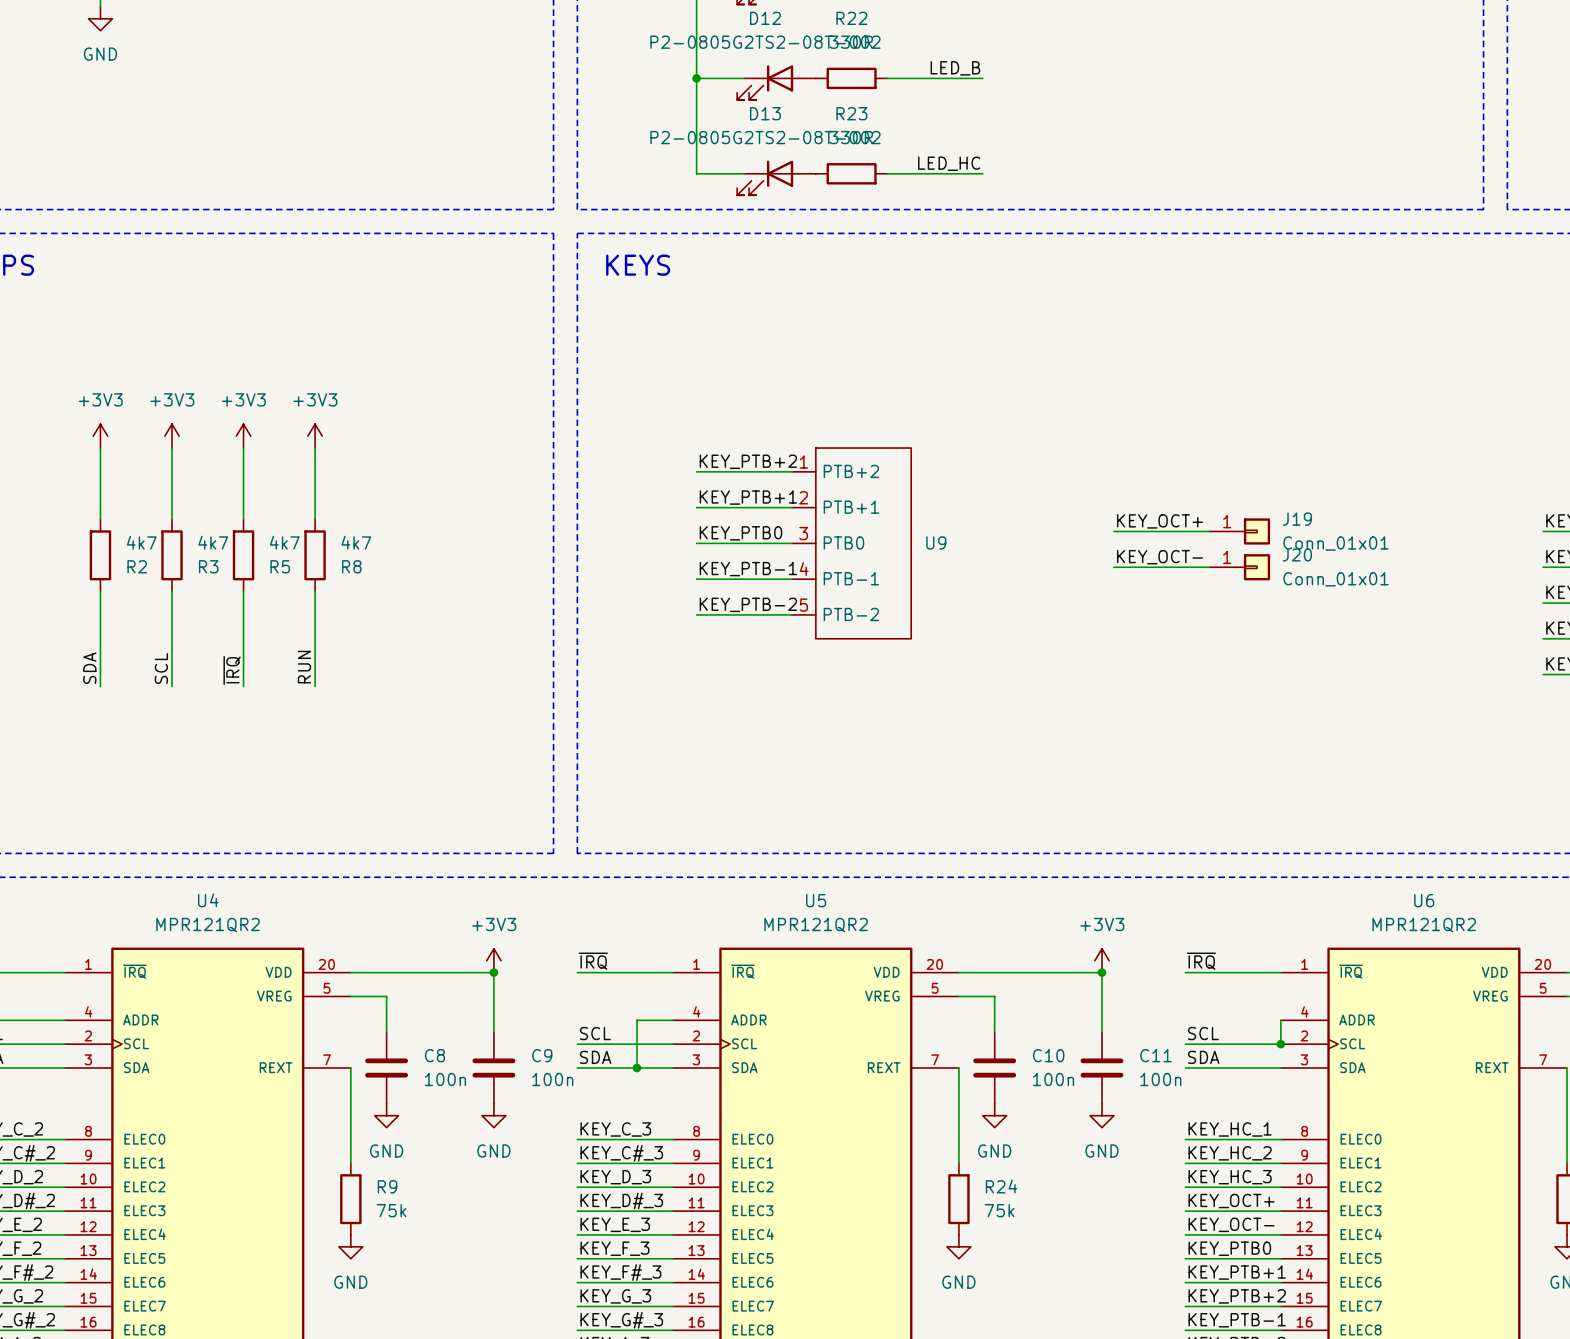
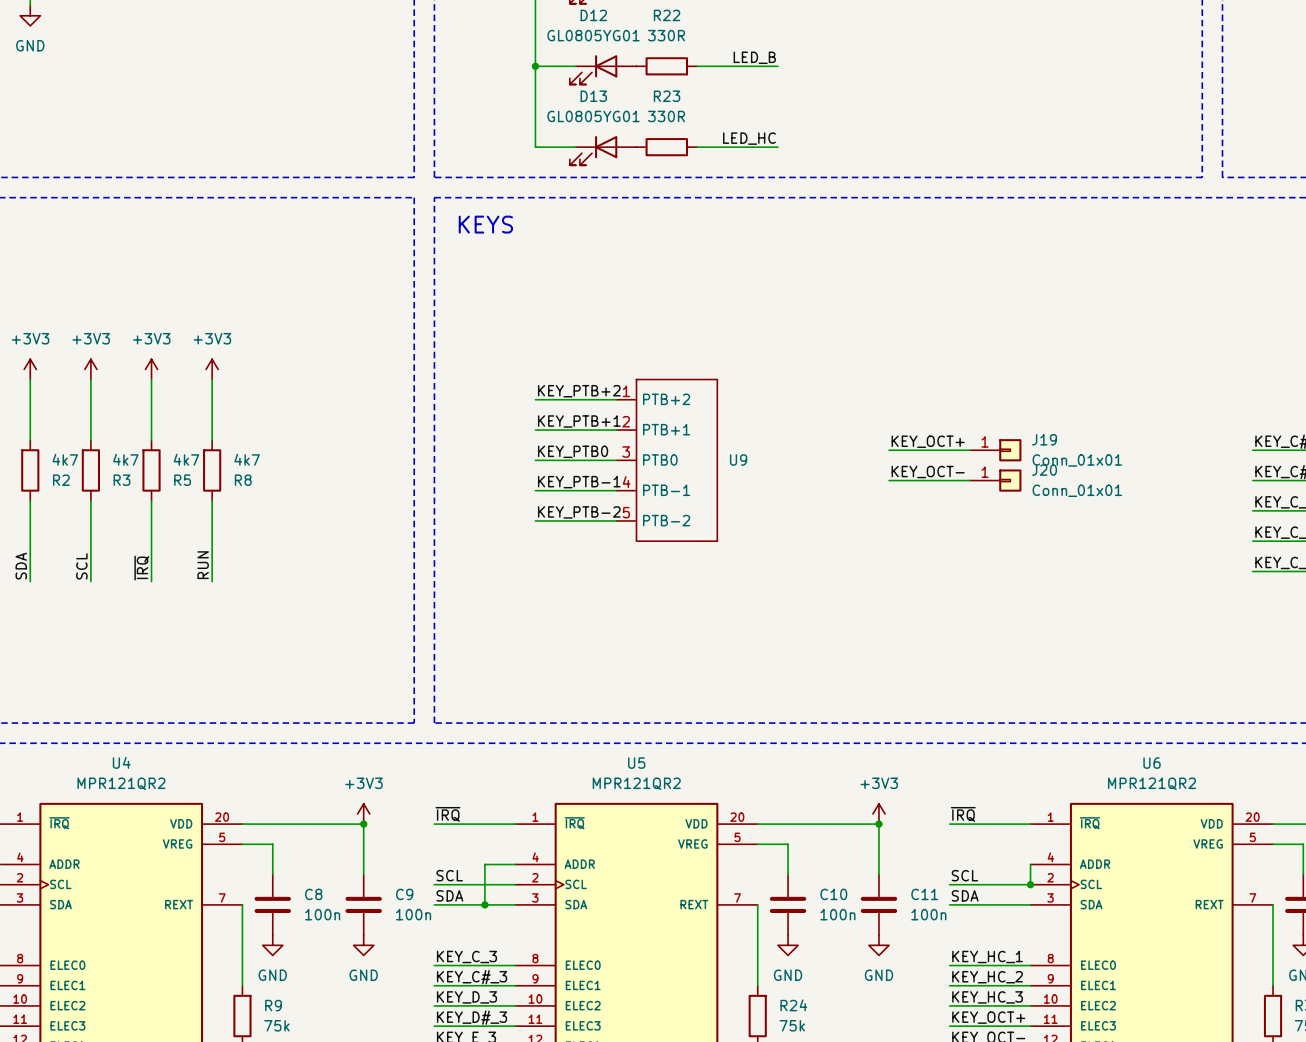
D12 value: P2-0805G2TS2-08T-002 (765, 42) -> GL0805YG01 (593, 35)
D13 value: P2-0805G2TS2-08T-002 (765, 137) -> GL0805YG01 (593, 116)

